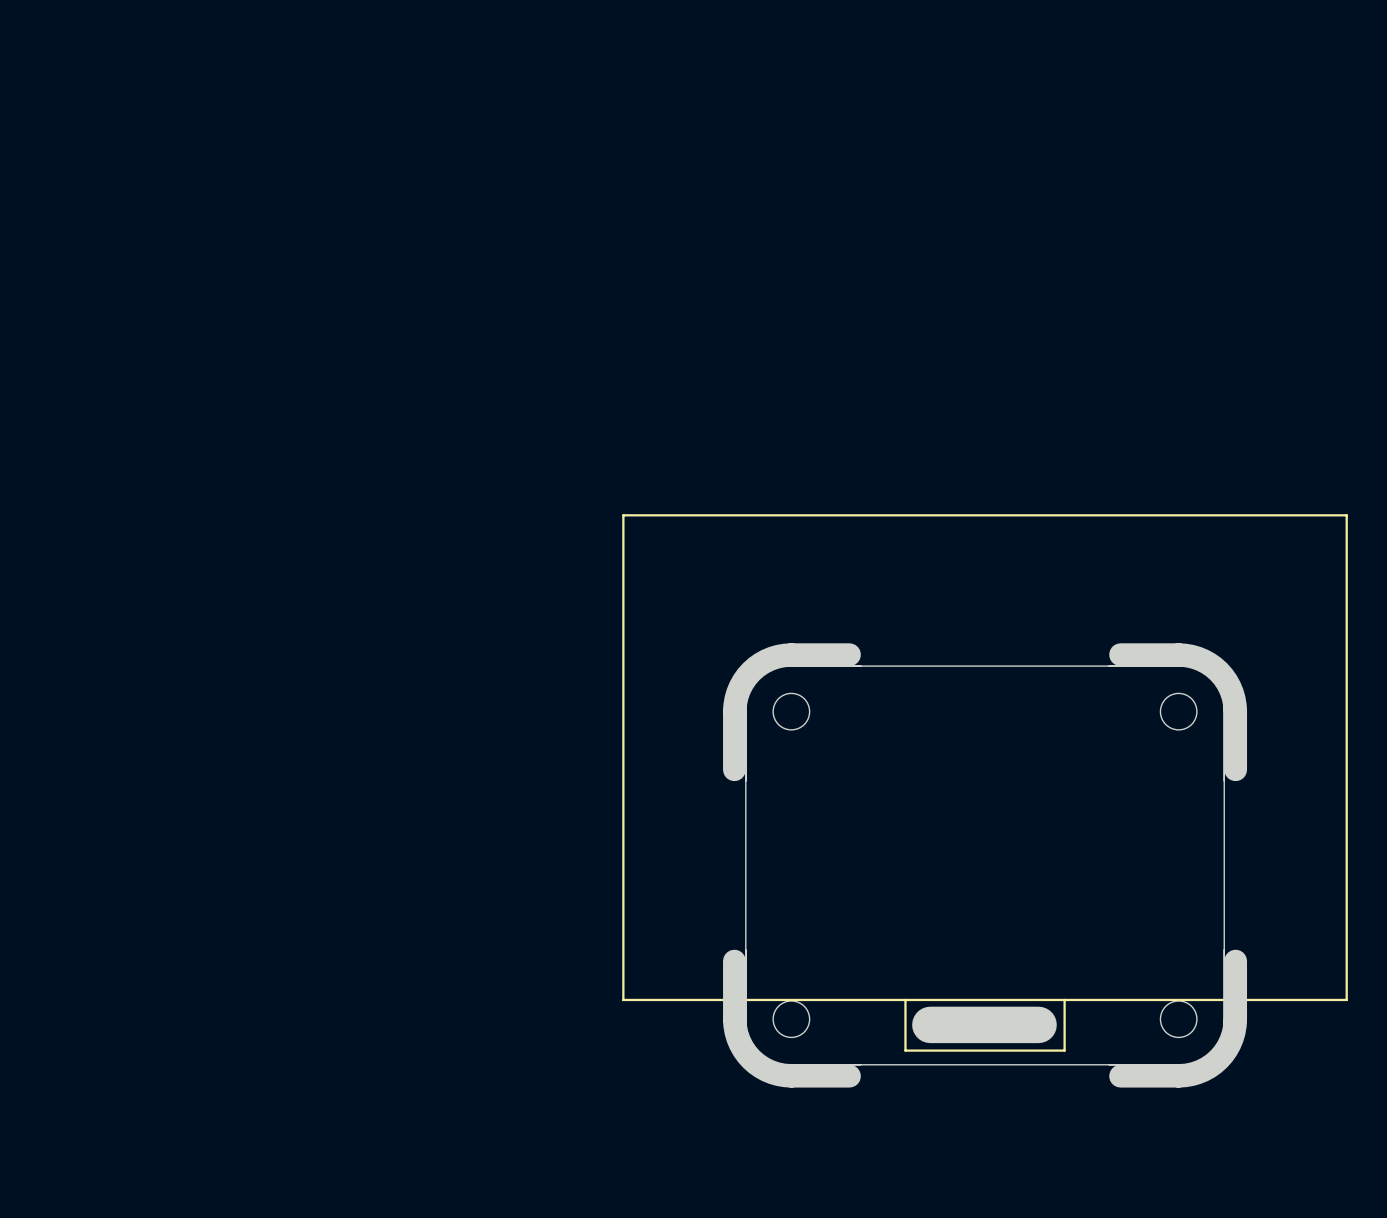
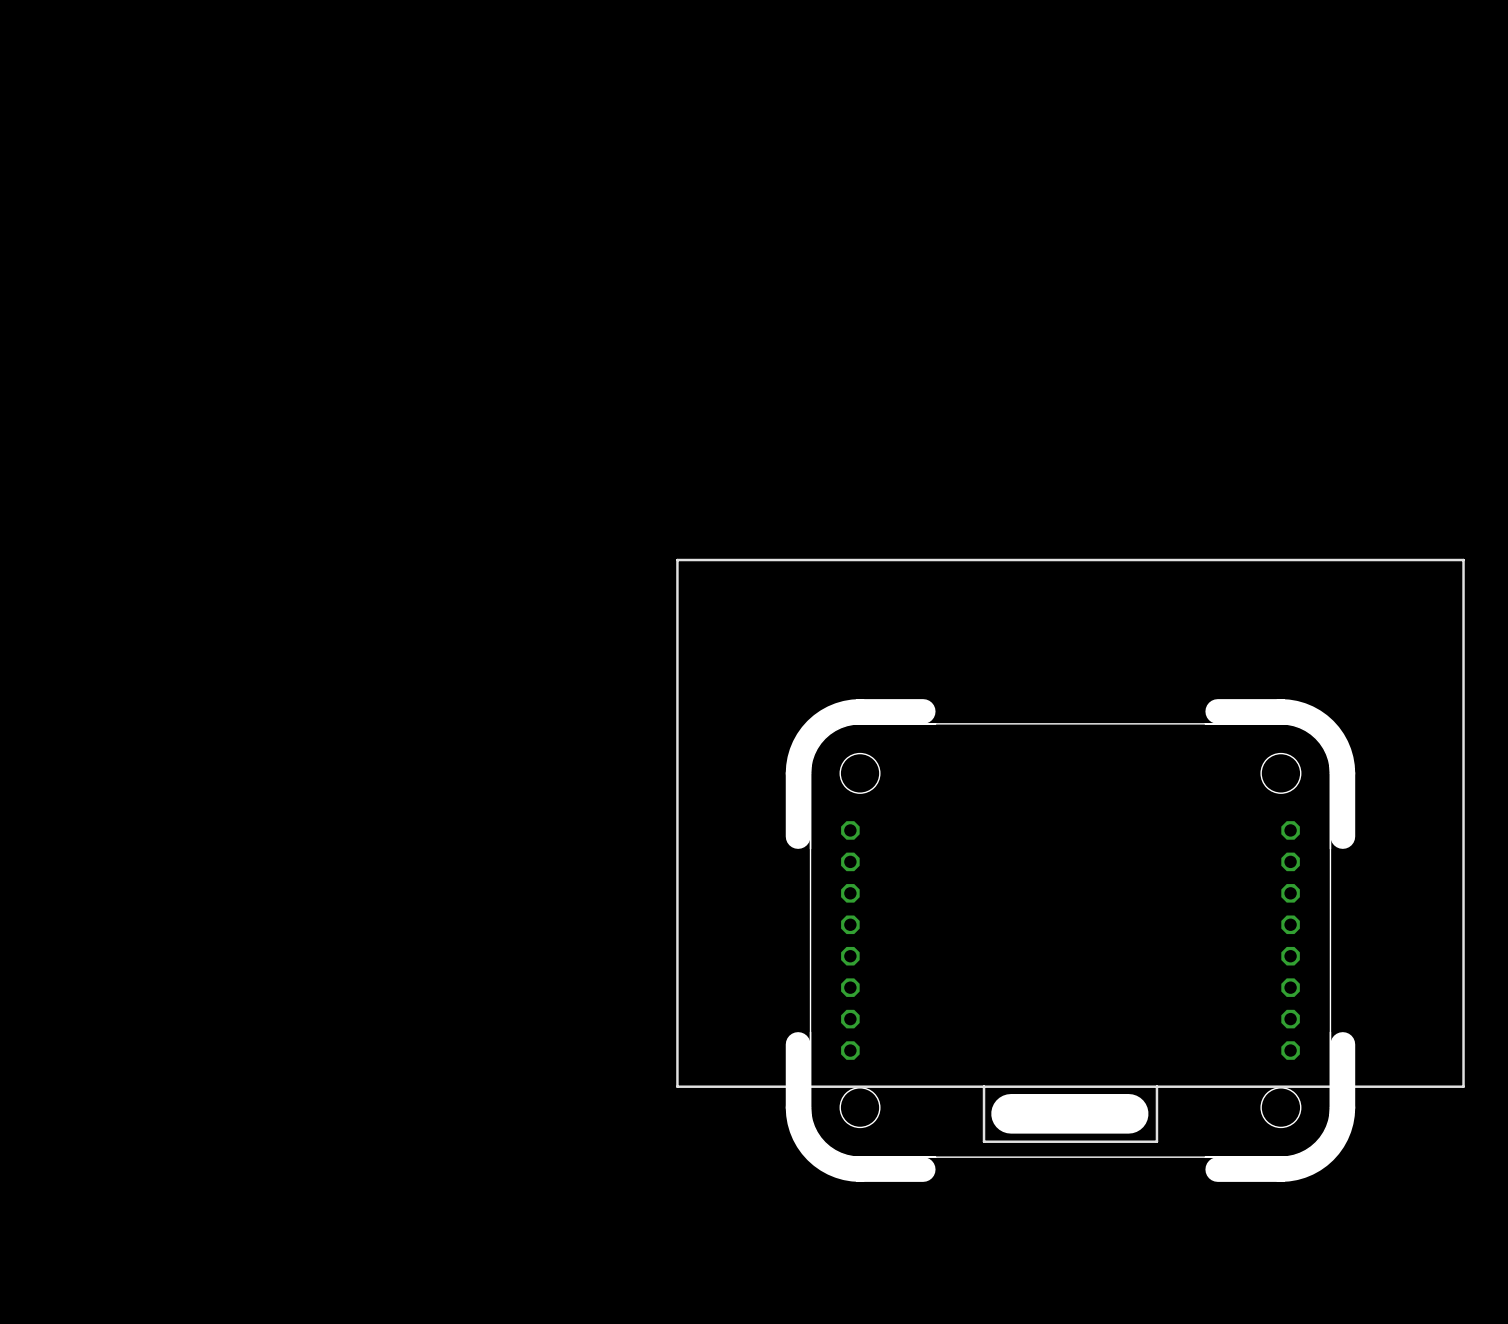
part: none -> (850, 940)
part: none -> (1290, 940)

